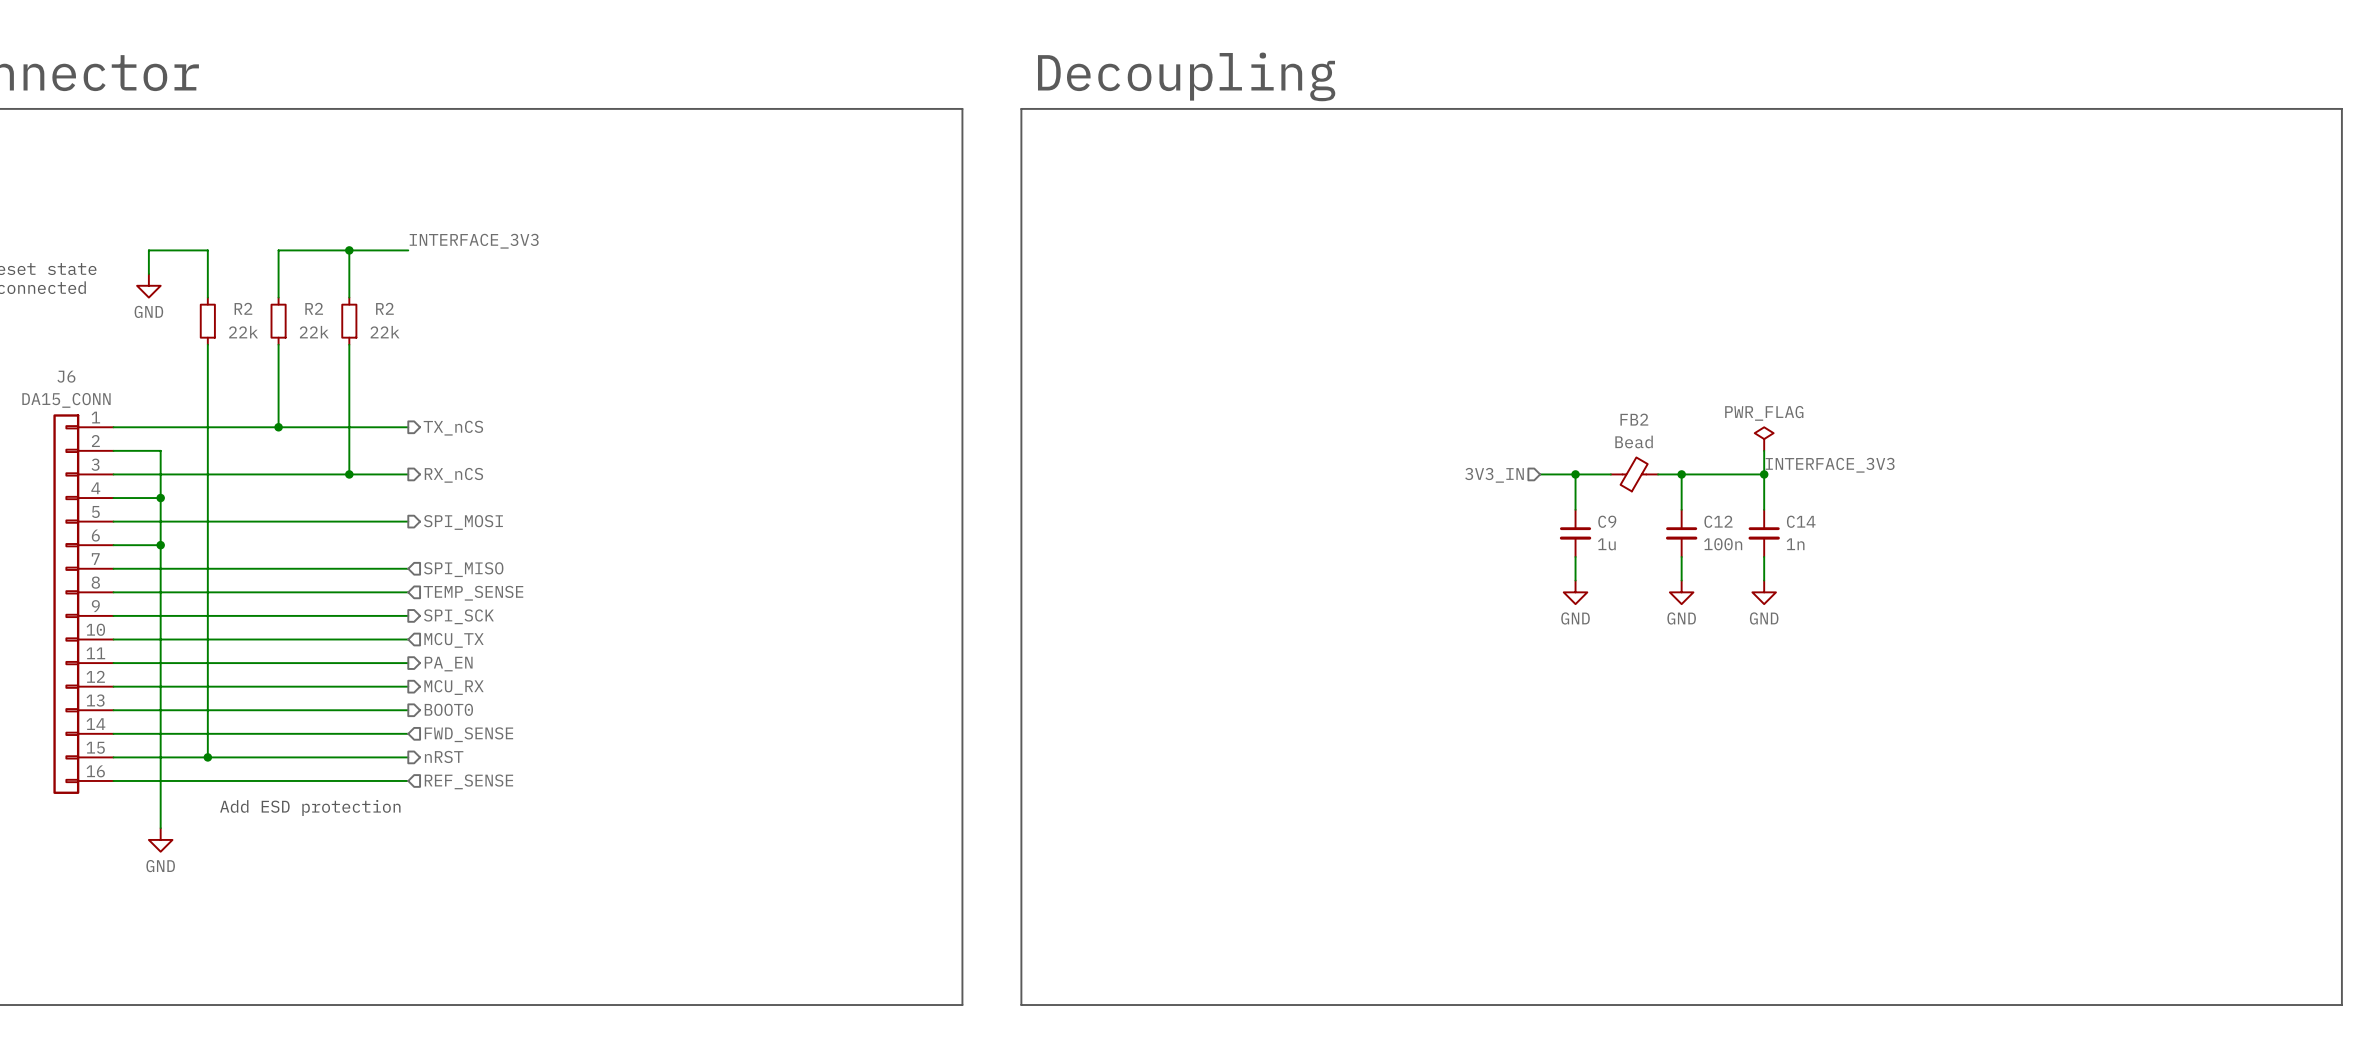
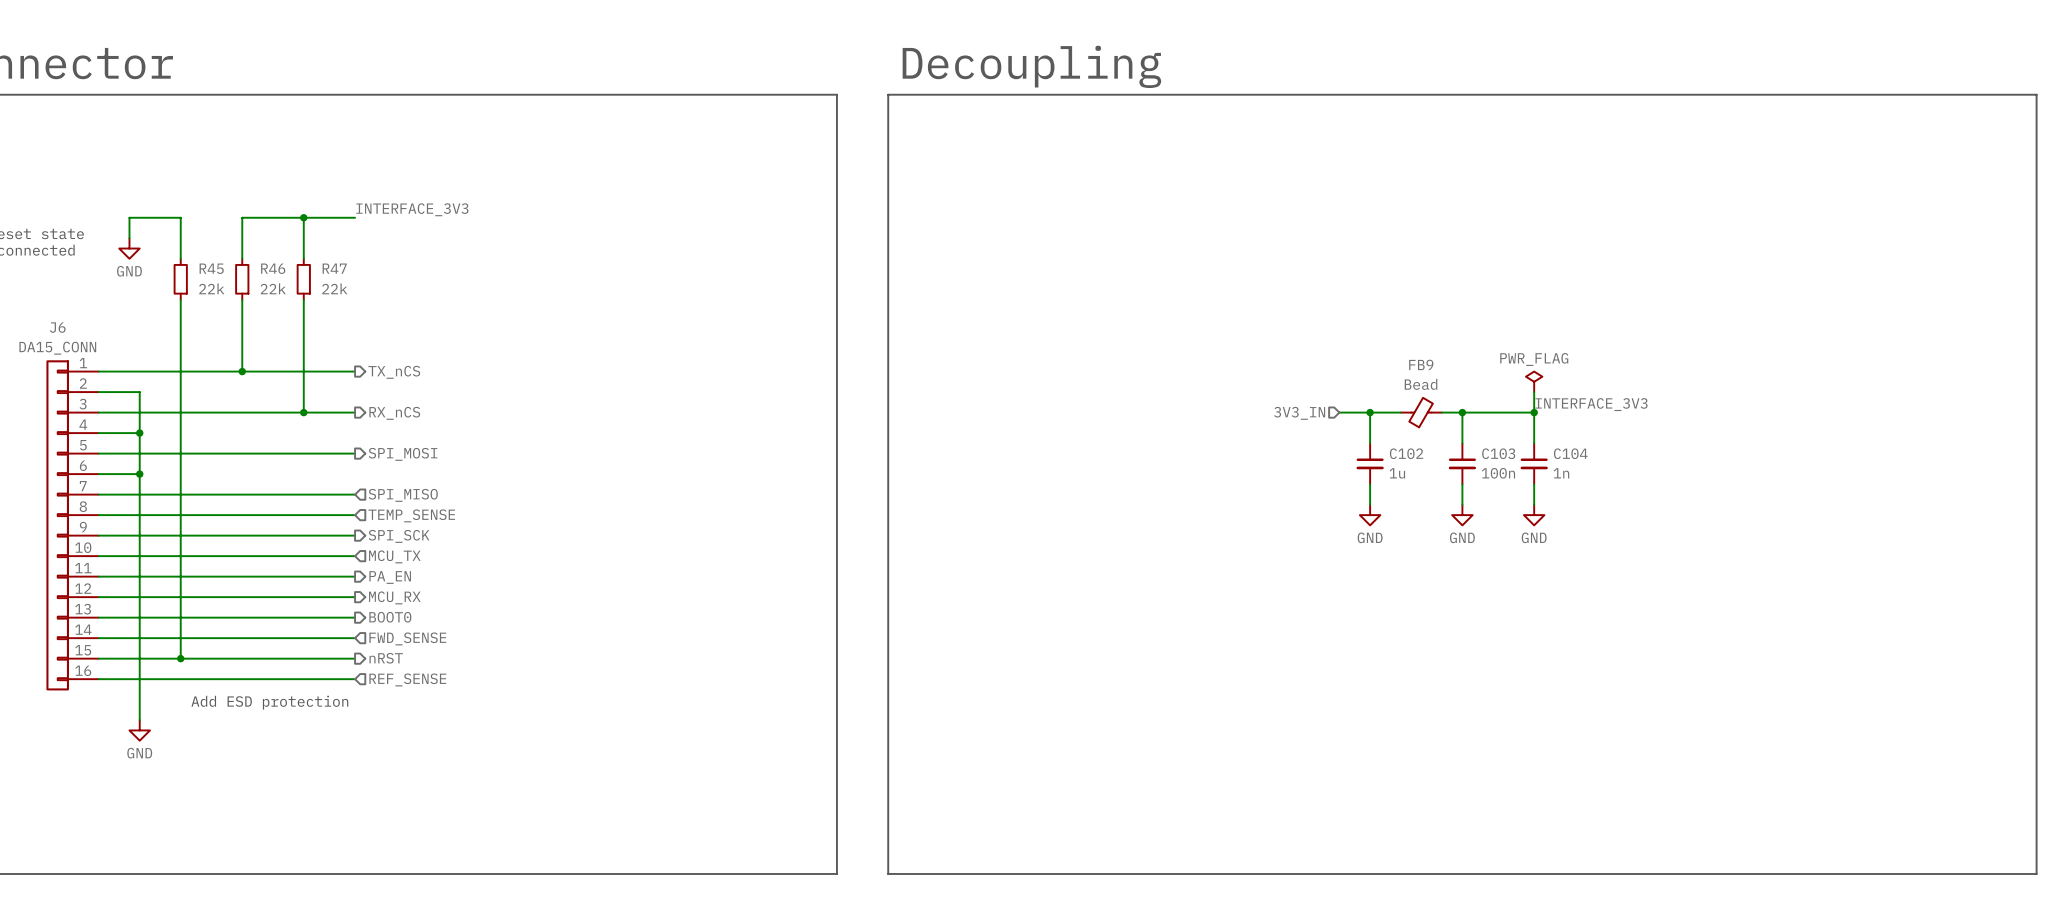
R2 name: R2 (243, 308) -> R45 (211, 268)
R2 name: R2 (314, 308) -> R46 (273, 268)
R2 name: R2 (384, 308) -> R47 (334, 268)
FB2 name: FB2 (1634, 419) -> FB9 (1421, 364)
C9 name: C9 (1607, 521) -> C102 (1406, 453)
C12 name: C12 (1718, 521) -> C103 (1498, 453)
C14 name: C14 (1801, 521) -> C104 (1570, 453)

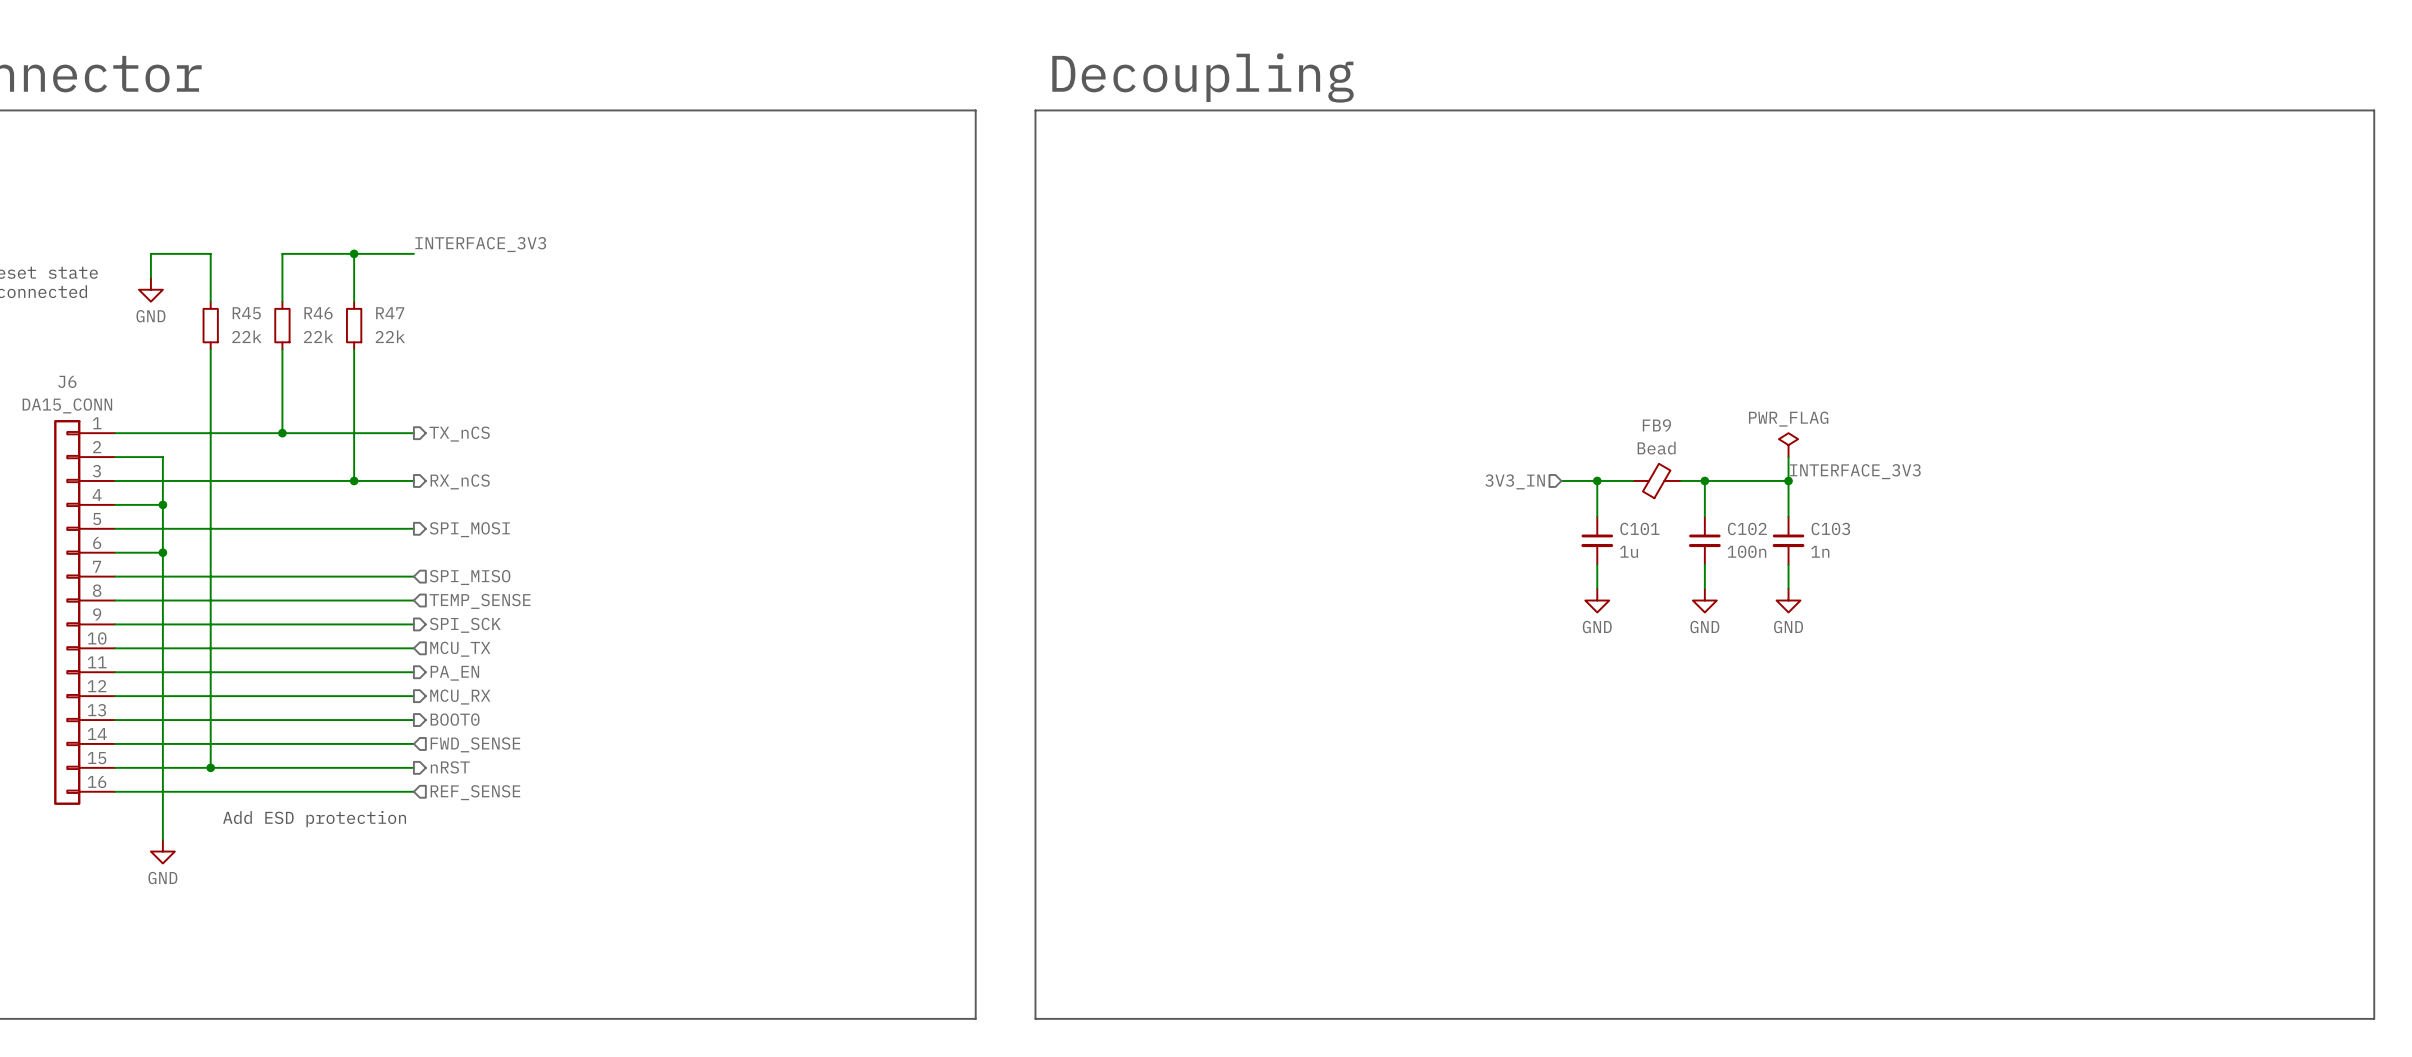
C102 name: C102 (1406, 453) -> C101 (1639, 528)
C103 name: C103 (1498, 453) -> C102 (1747, 528)
C104 name: C104 (1570, 453) -> C103 (1830, 528)

